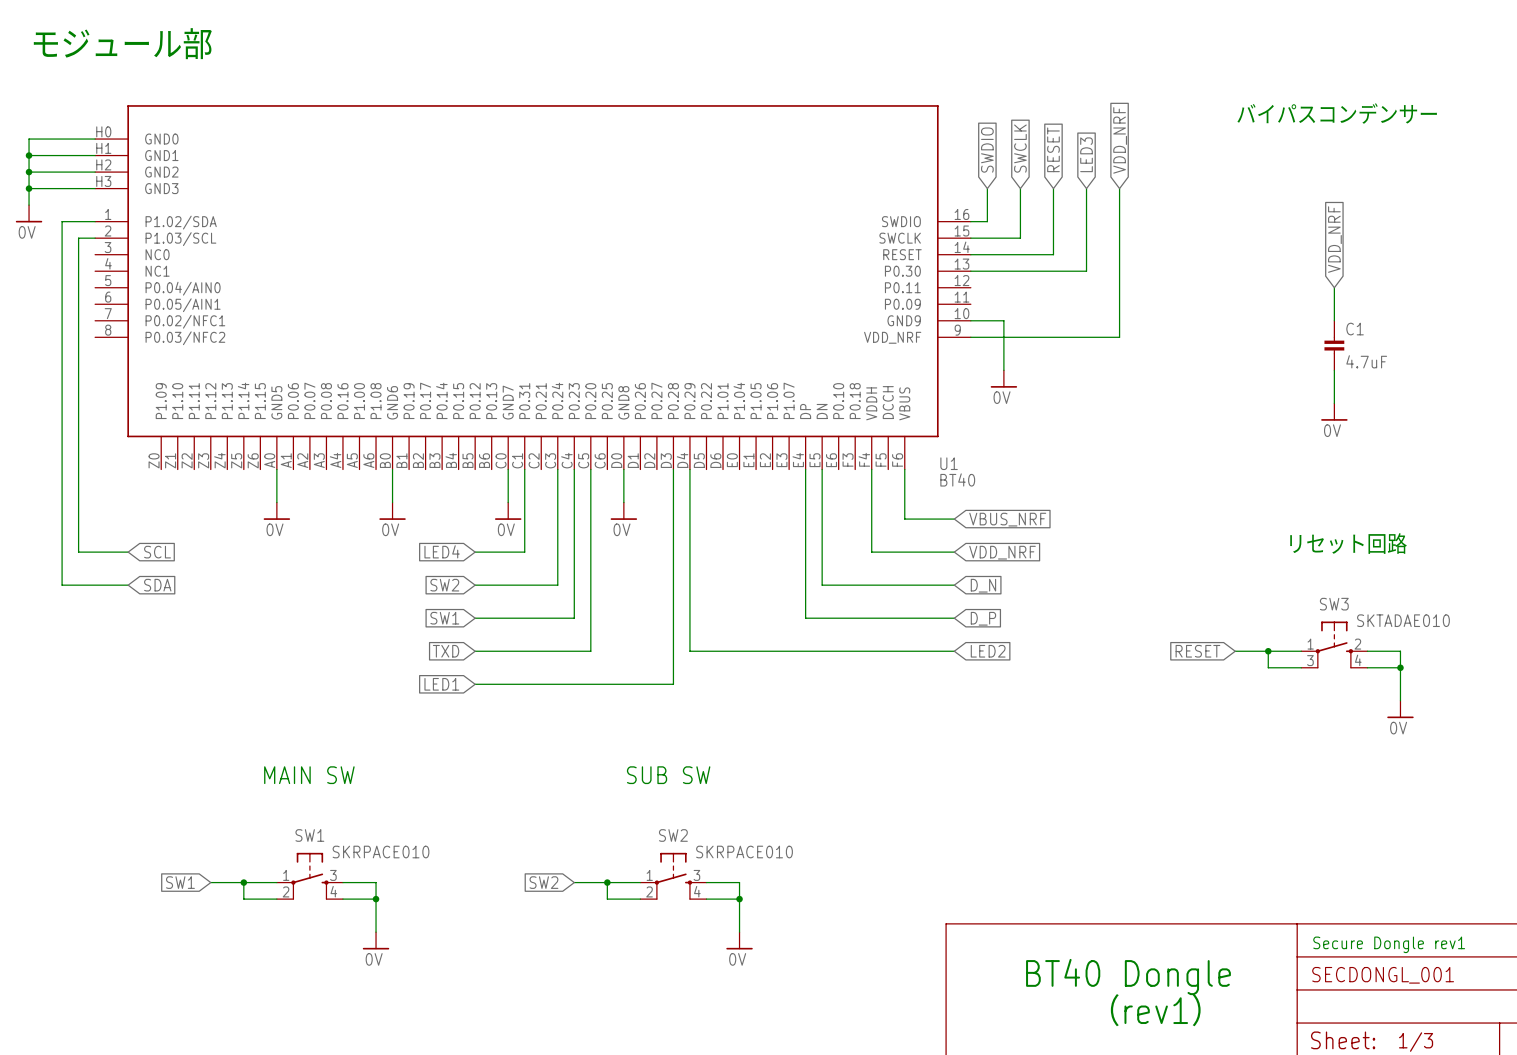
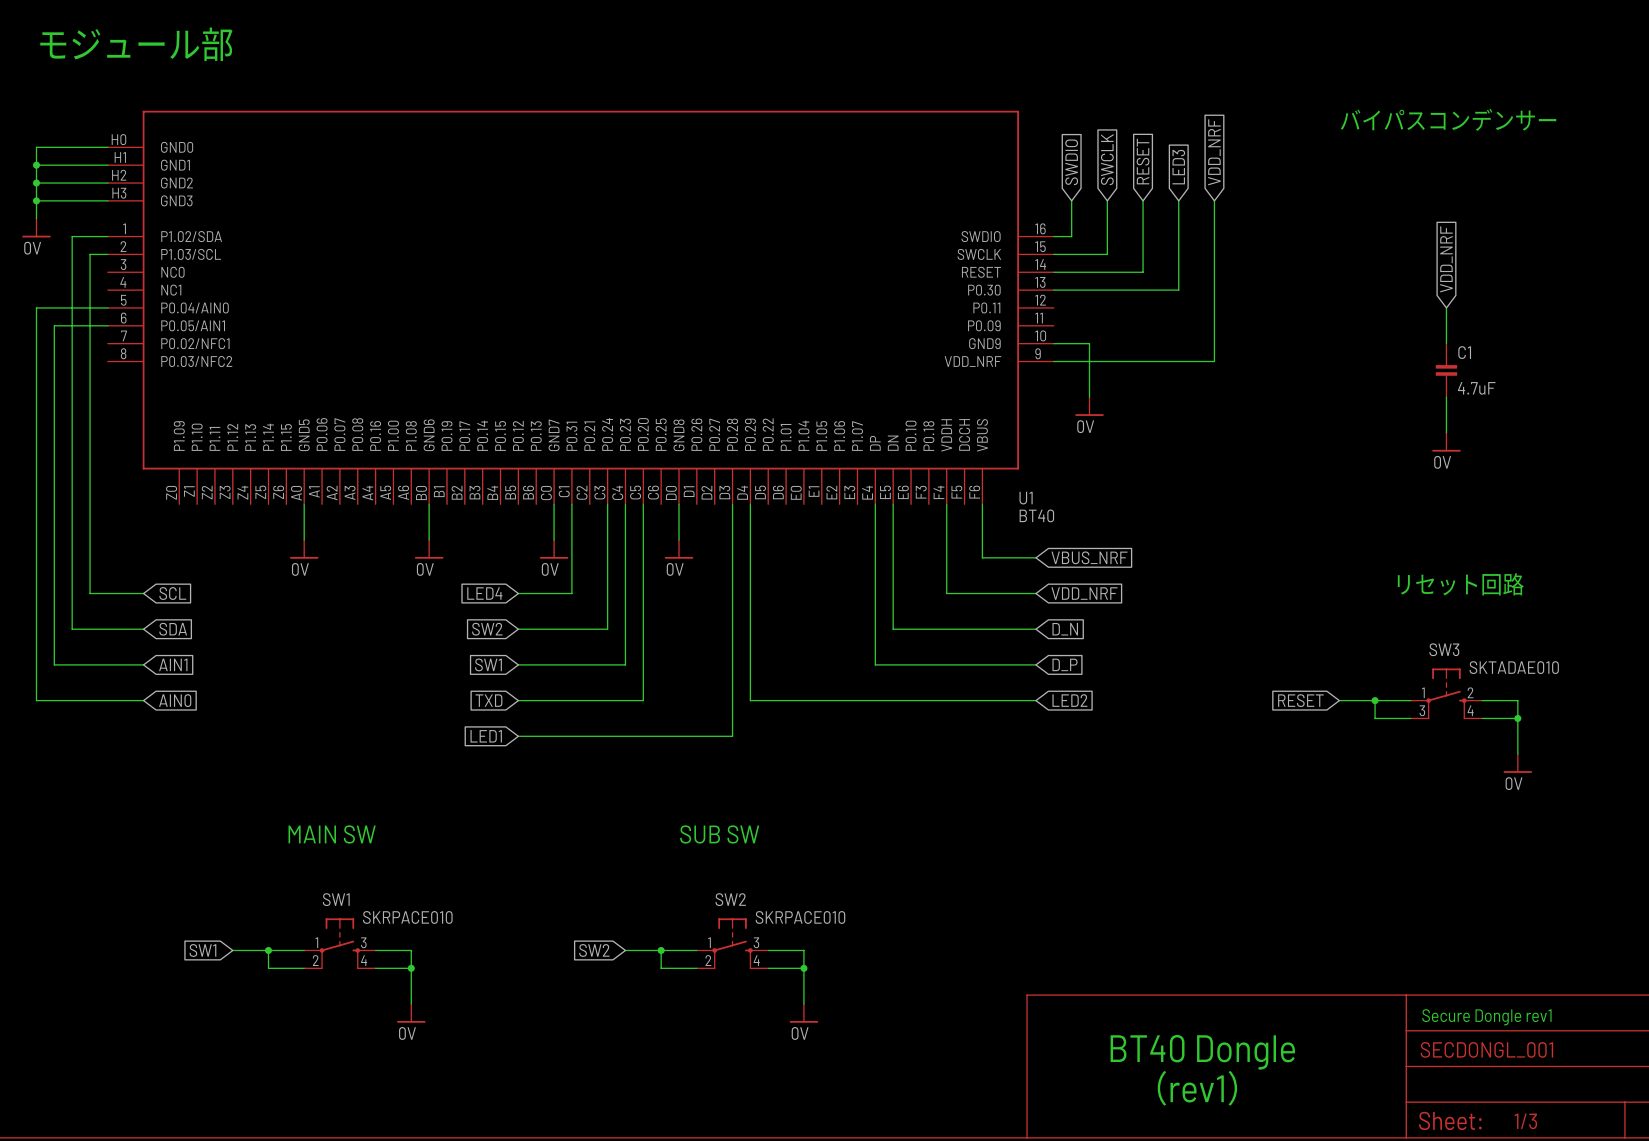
wire: none -> (107, 307) (36, 307) (36, 700) (143, 700)
wire: none -> (107, 325) (54, 325) (54, 664) (143, 664)
global label: none -> AIN1 (173, 664)
global label: none -> AIN0 (175, 700)

